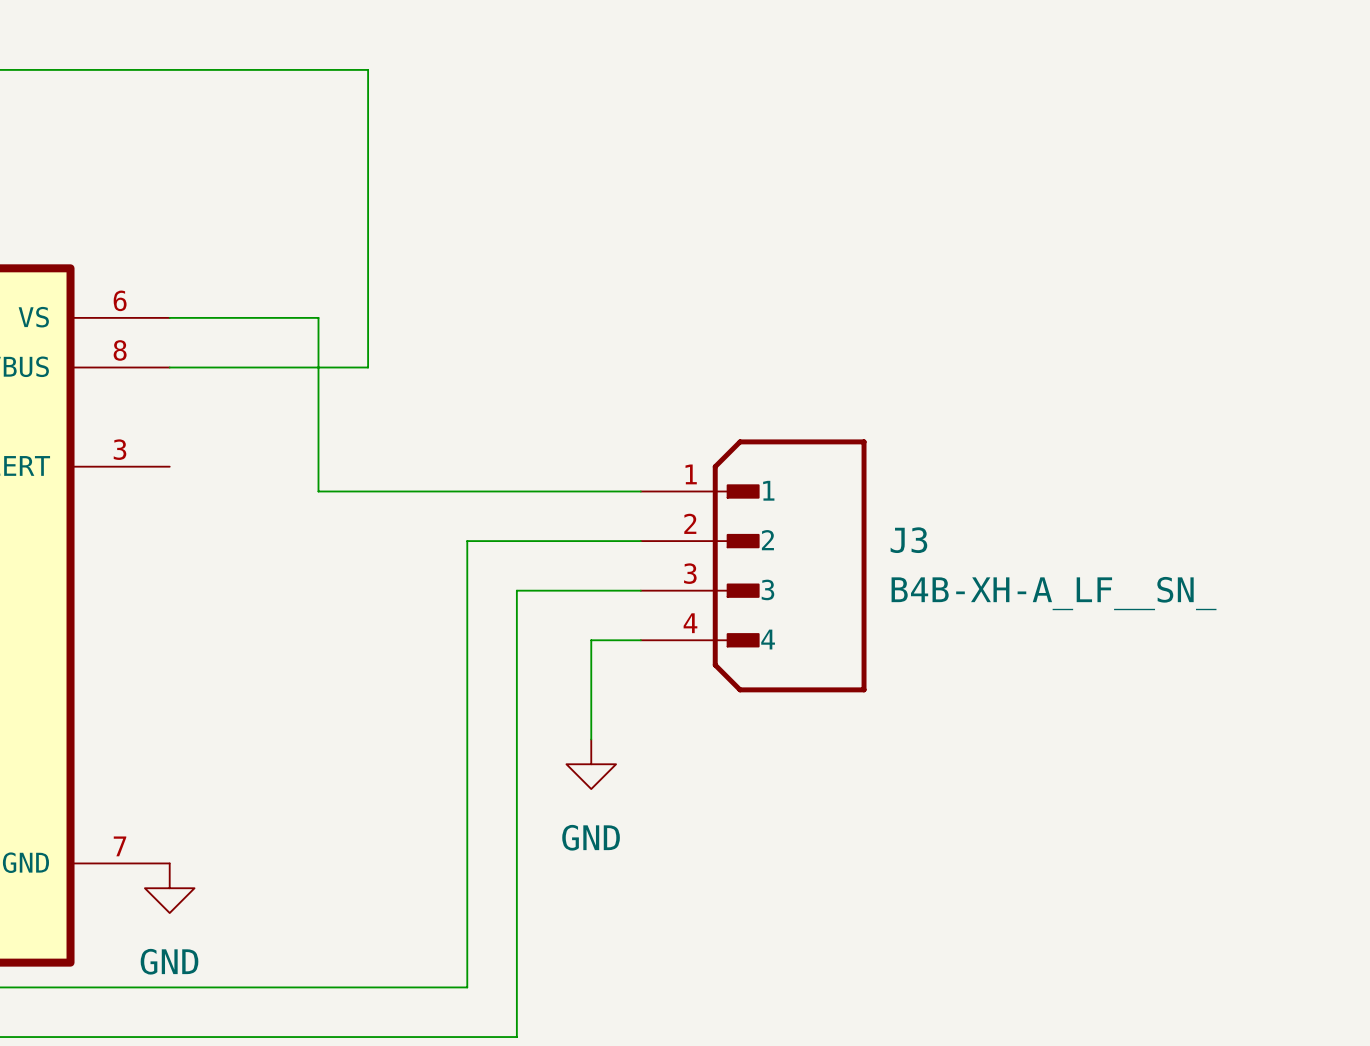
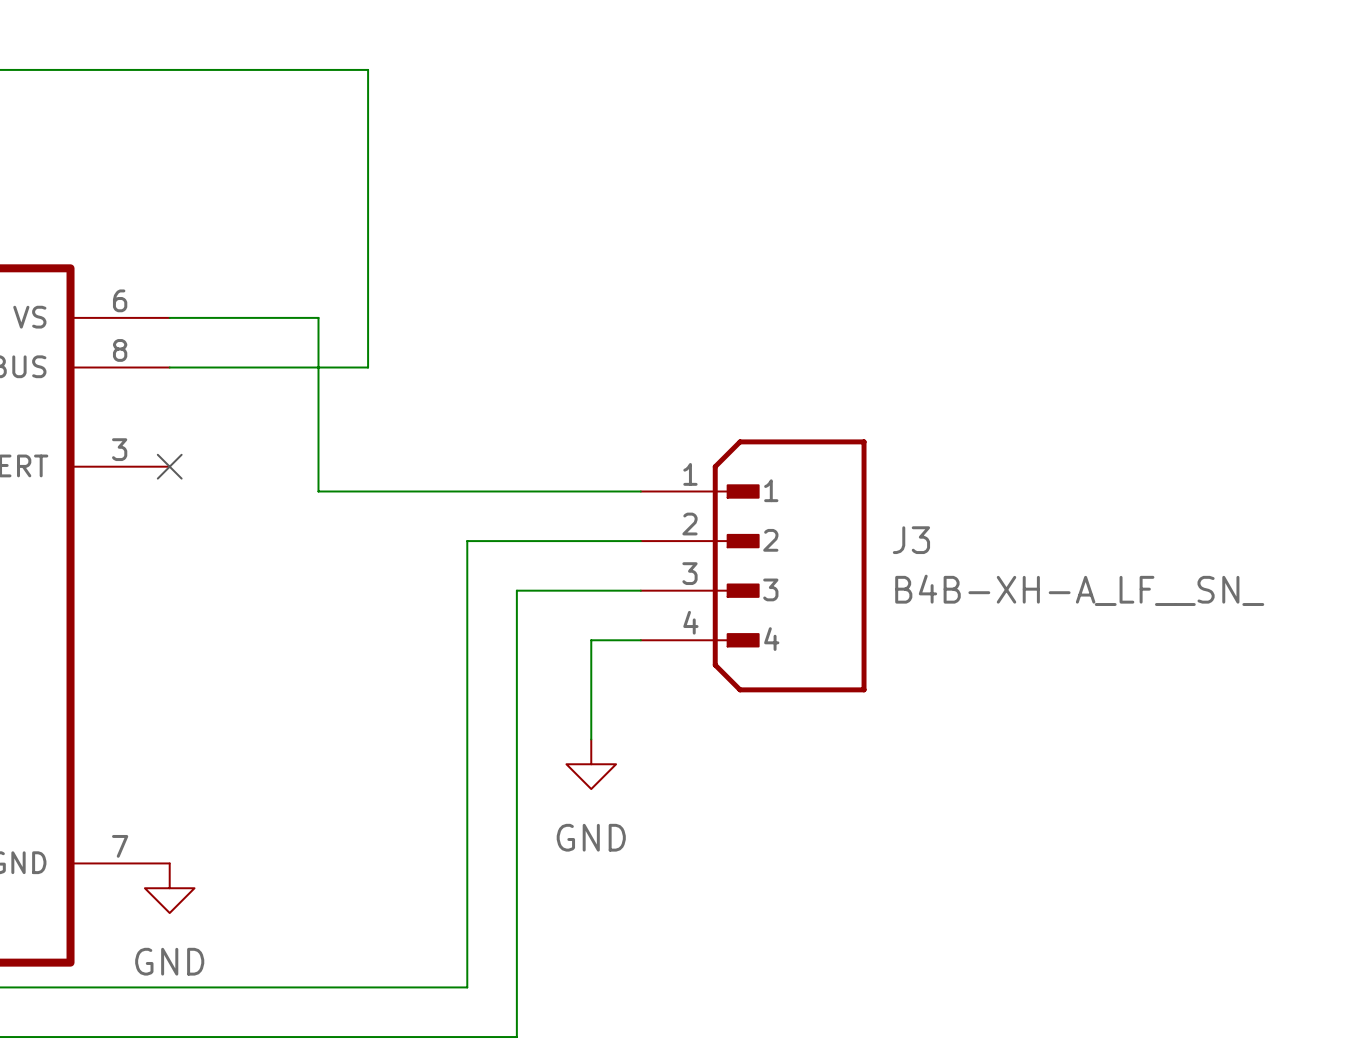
no-connect mark: none -> (169, 466)

